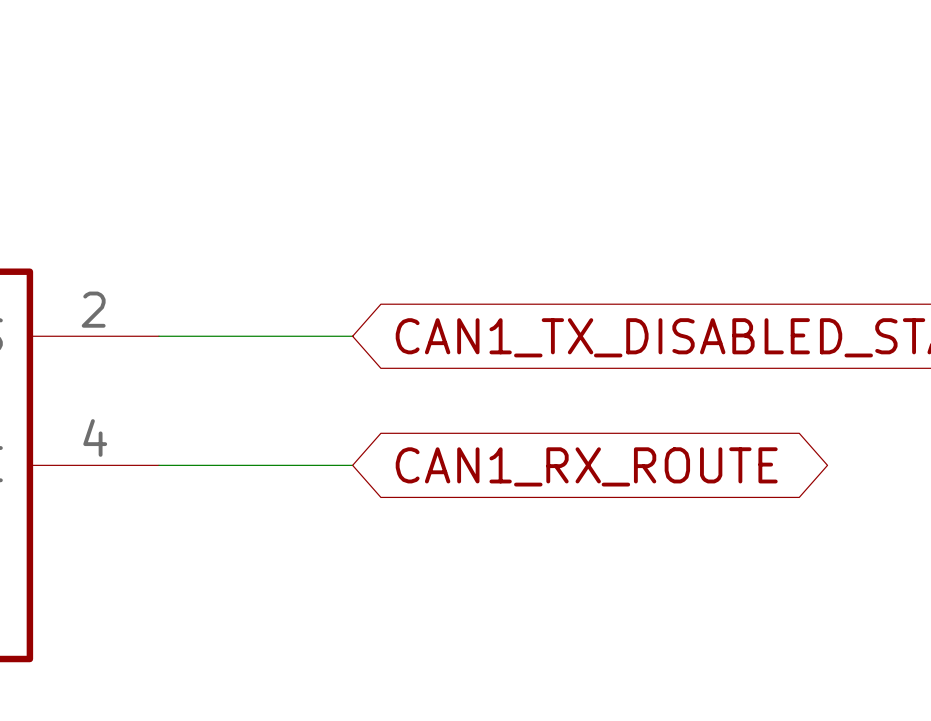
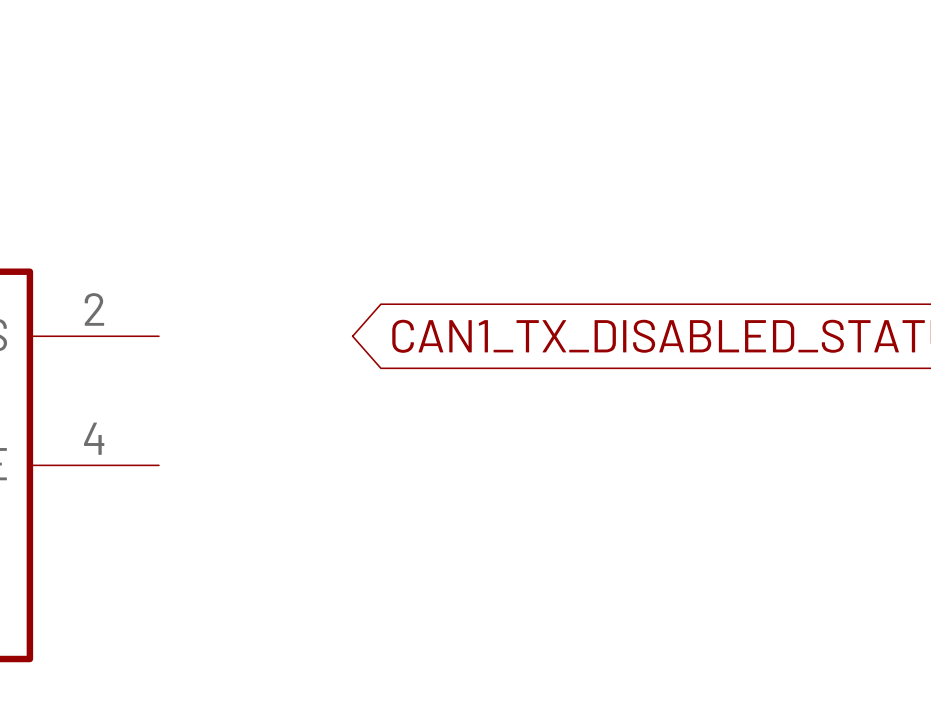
wire: (158, 336) (352, 336) -> none
wire: (158, 465) (352, 465) -> none
global label: CAN1_RX_ROUTE (586, 466) -> none

